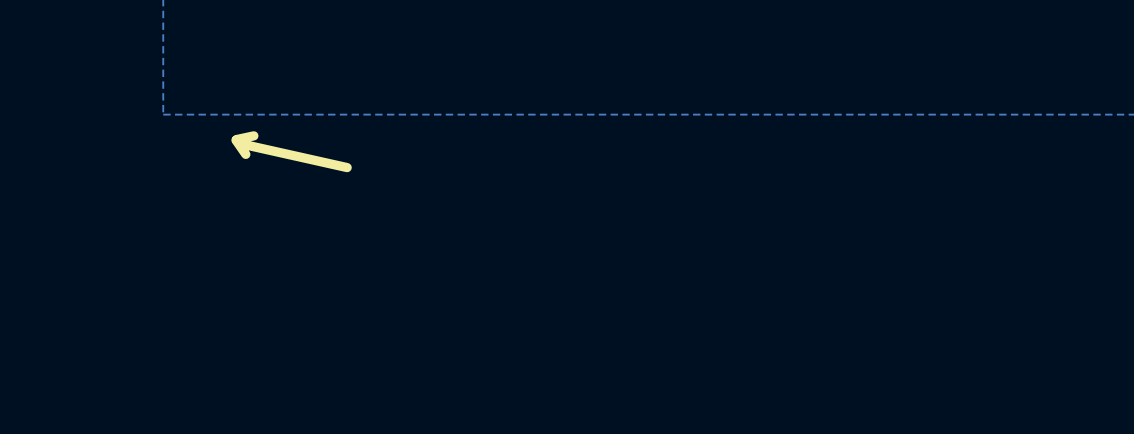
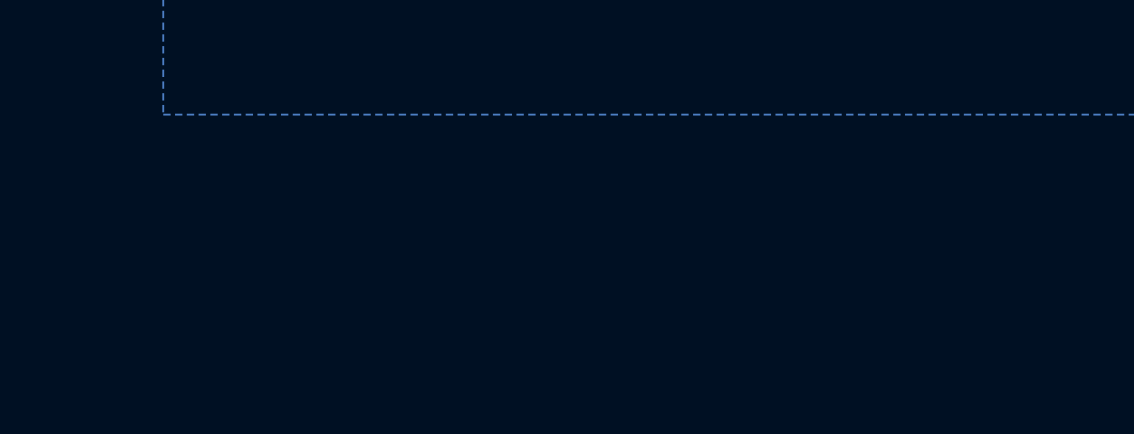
line: (253, 135) (236, 139) -> none
line: (235, 140) (245, 154) -> none
line: (247, 145) (347, 167) -> none

